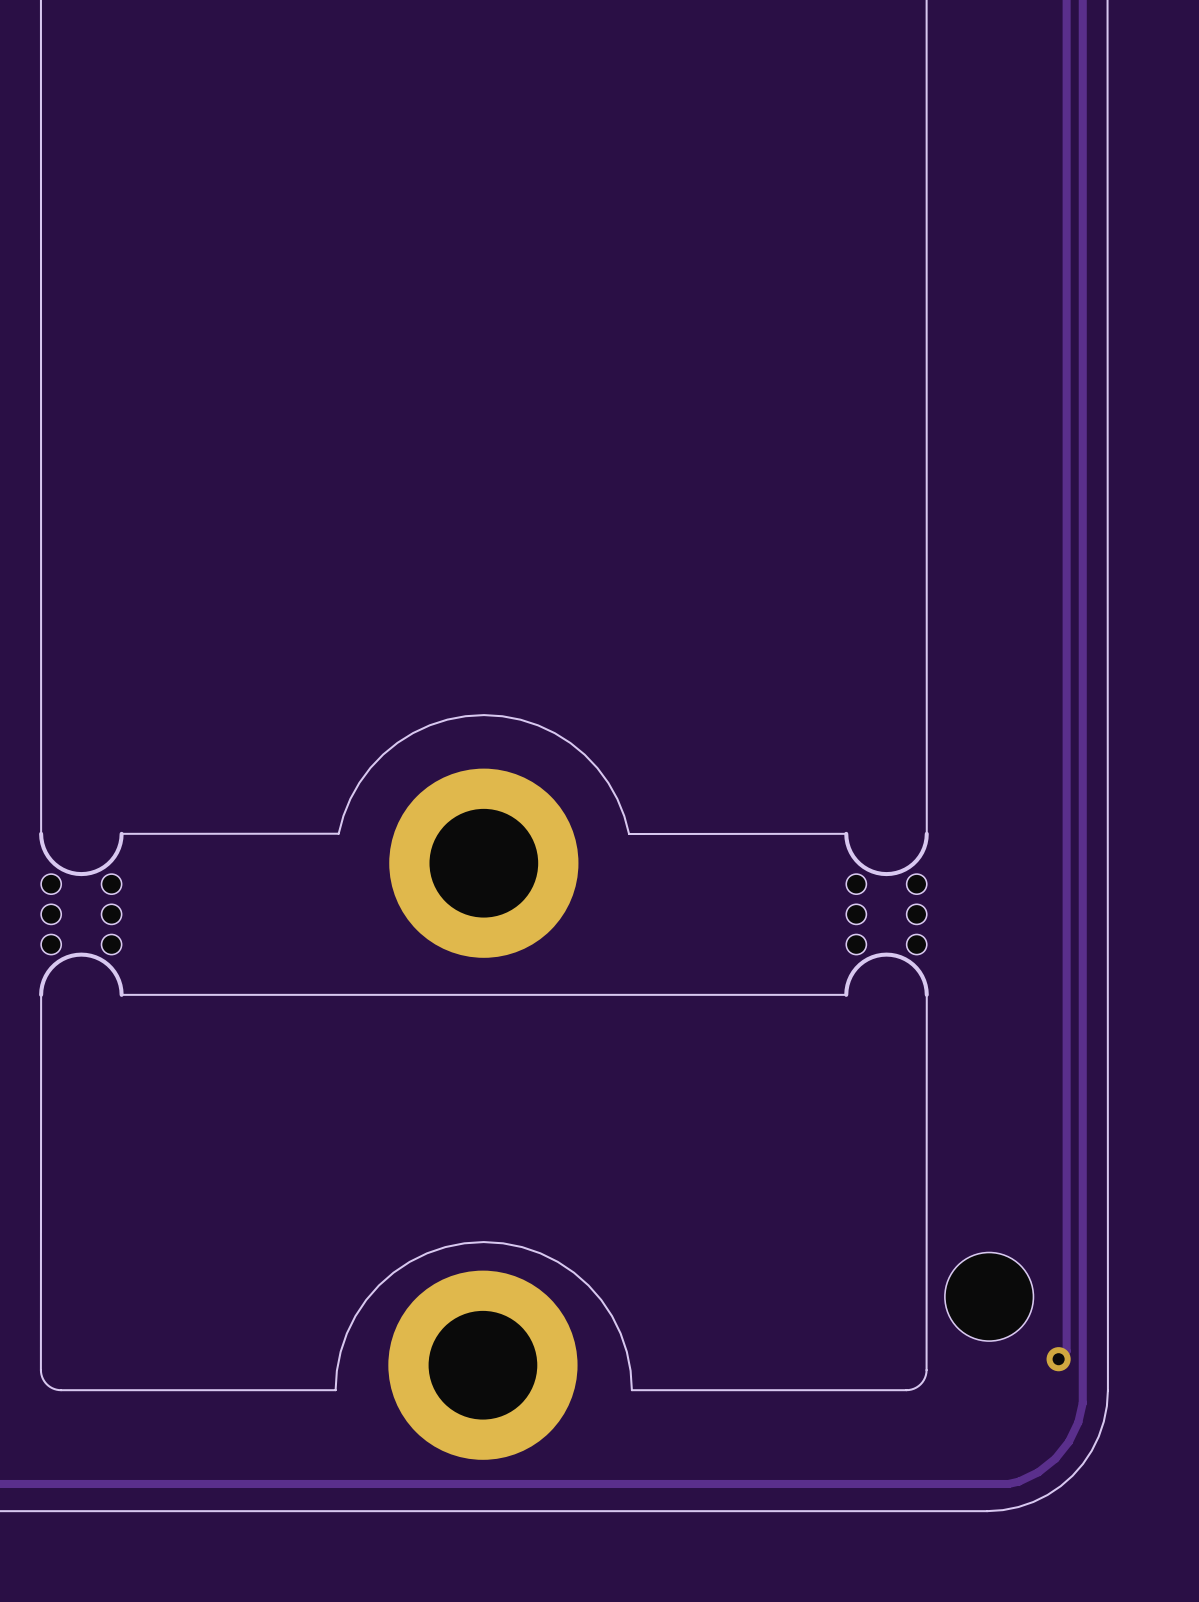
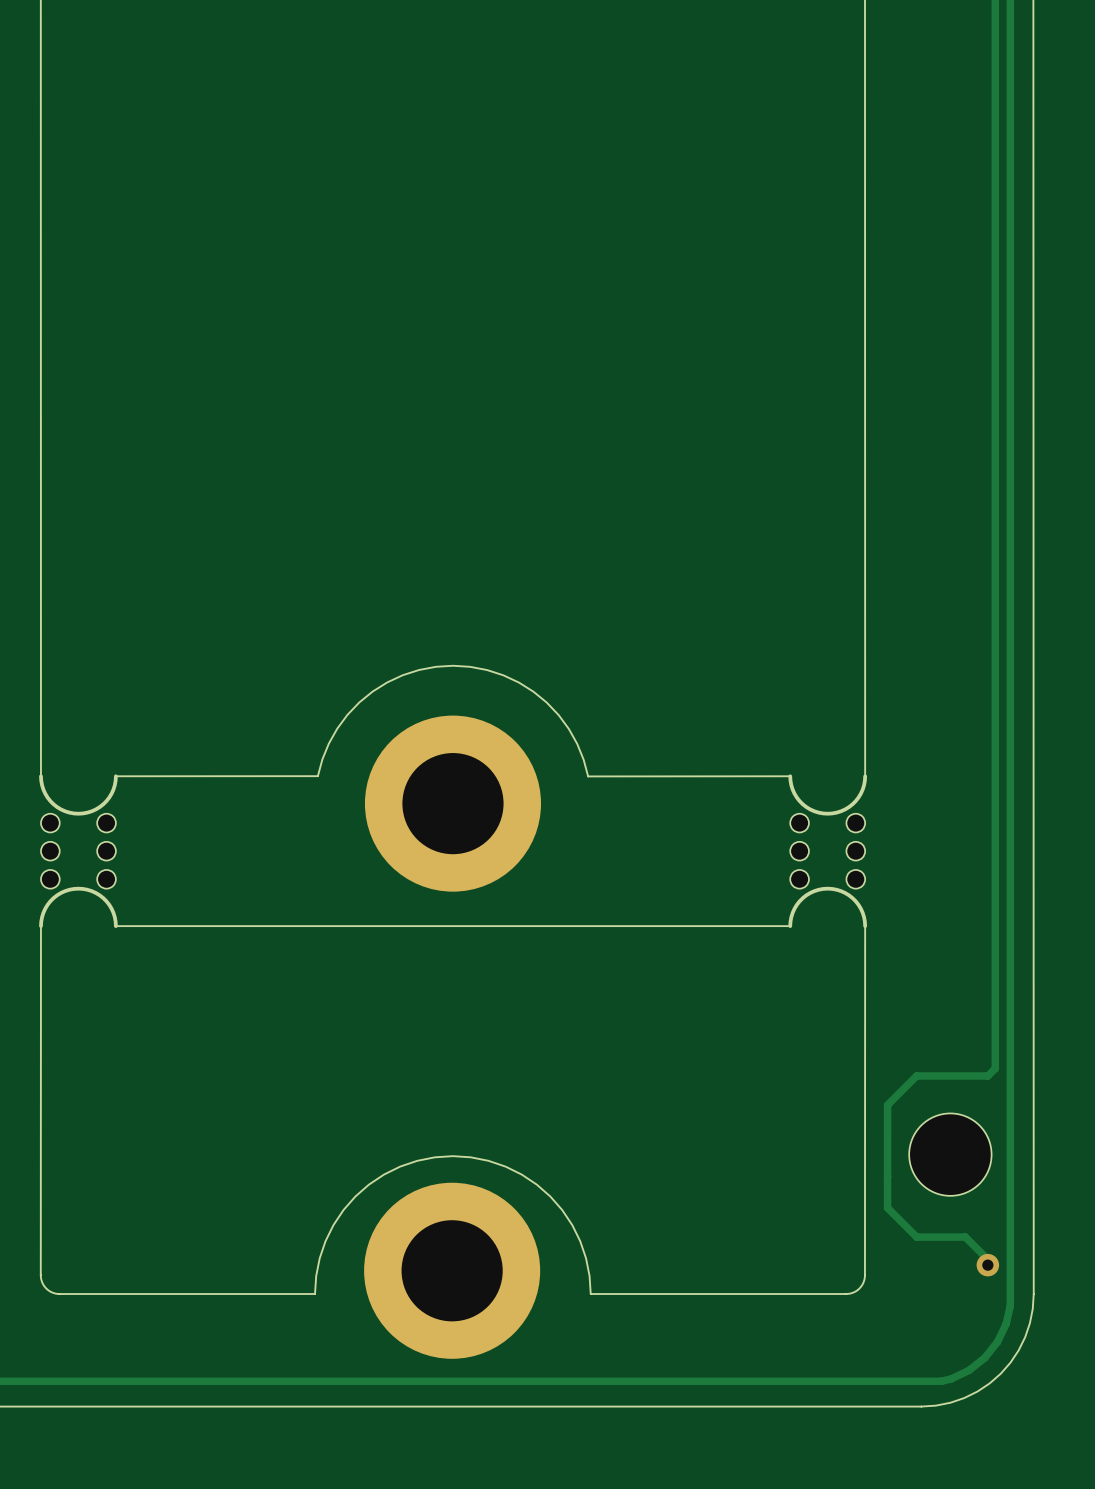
track: (1066, 1147) (1066, 1351) (1058, 1359) -> (995, 1068) (987, 1075) (916, 1075) (887, 1105) (887, 1207) (916, 1237) (965, 1237) (987, 1259) (987, 1265)
part position: (989, 1296) -> (950, 1154)

